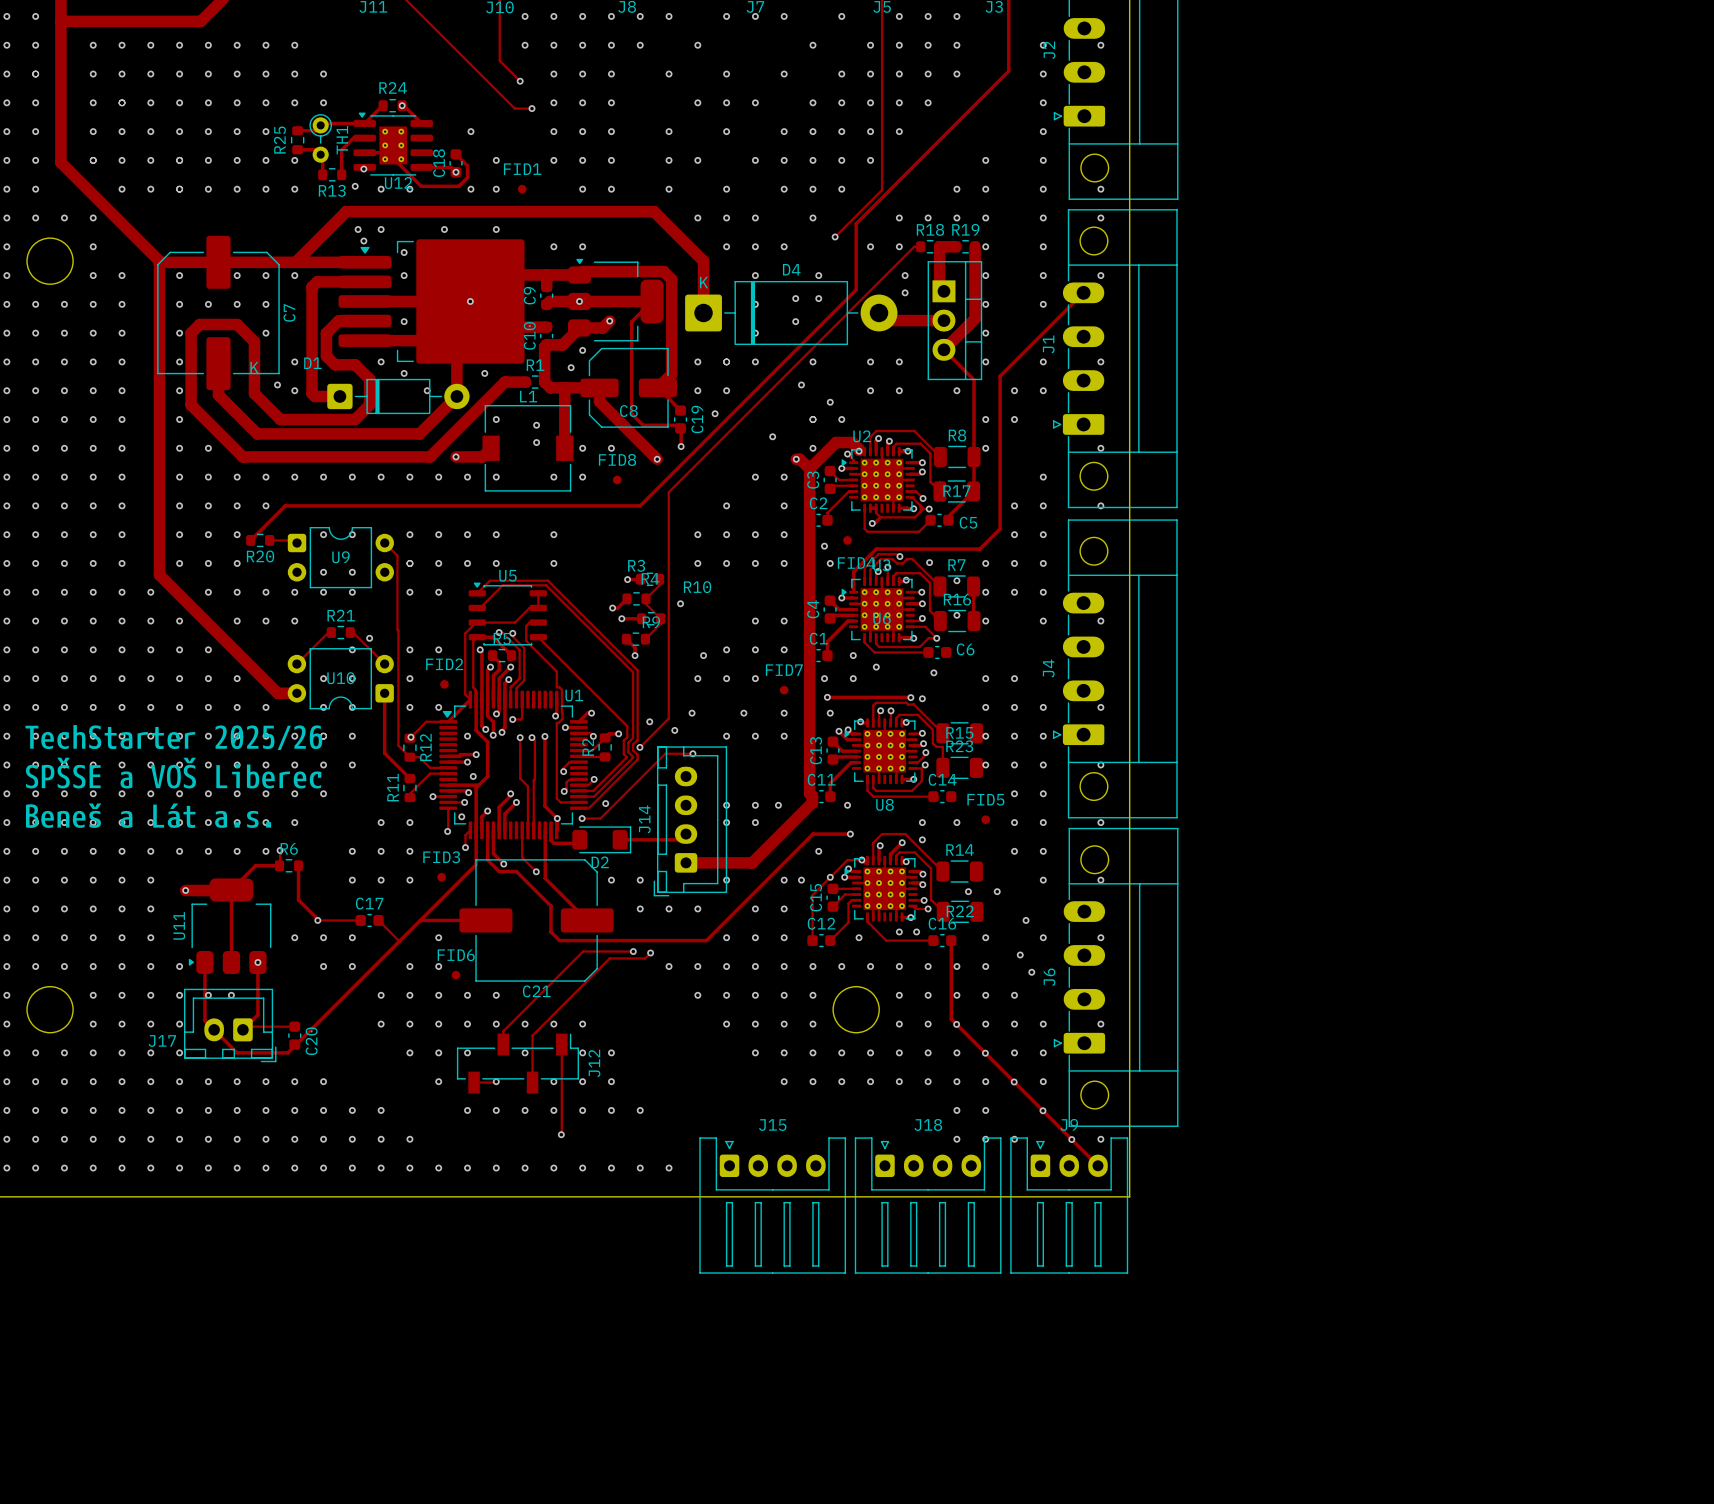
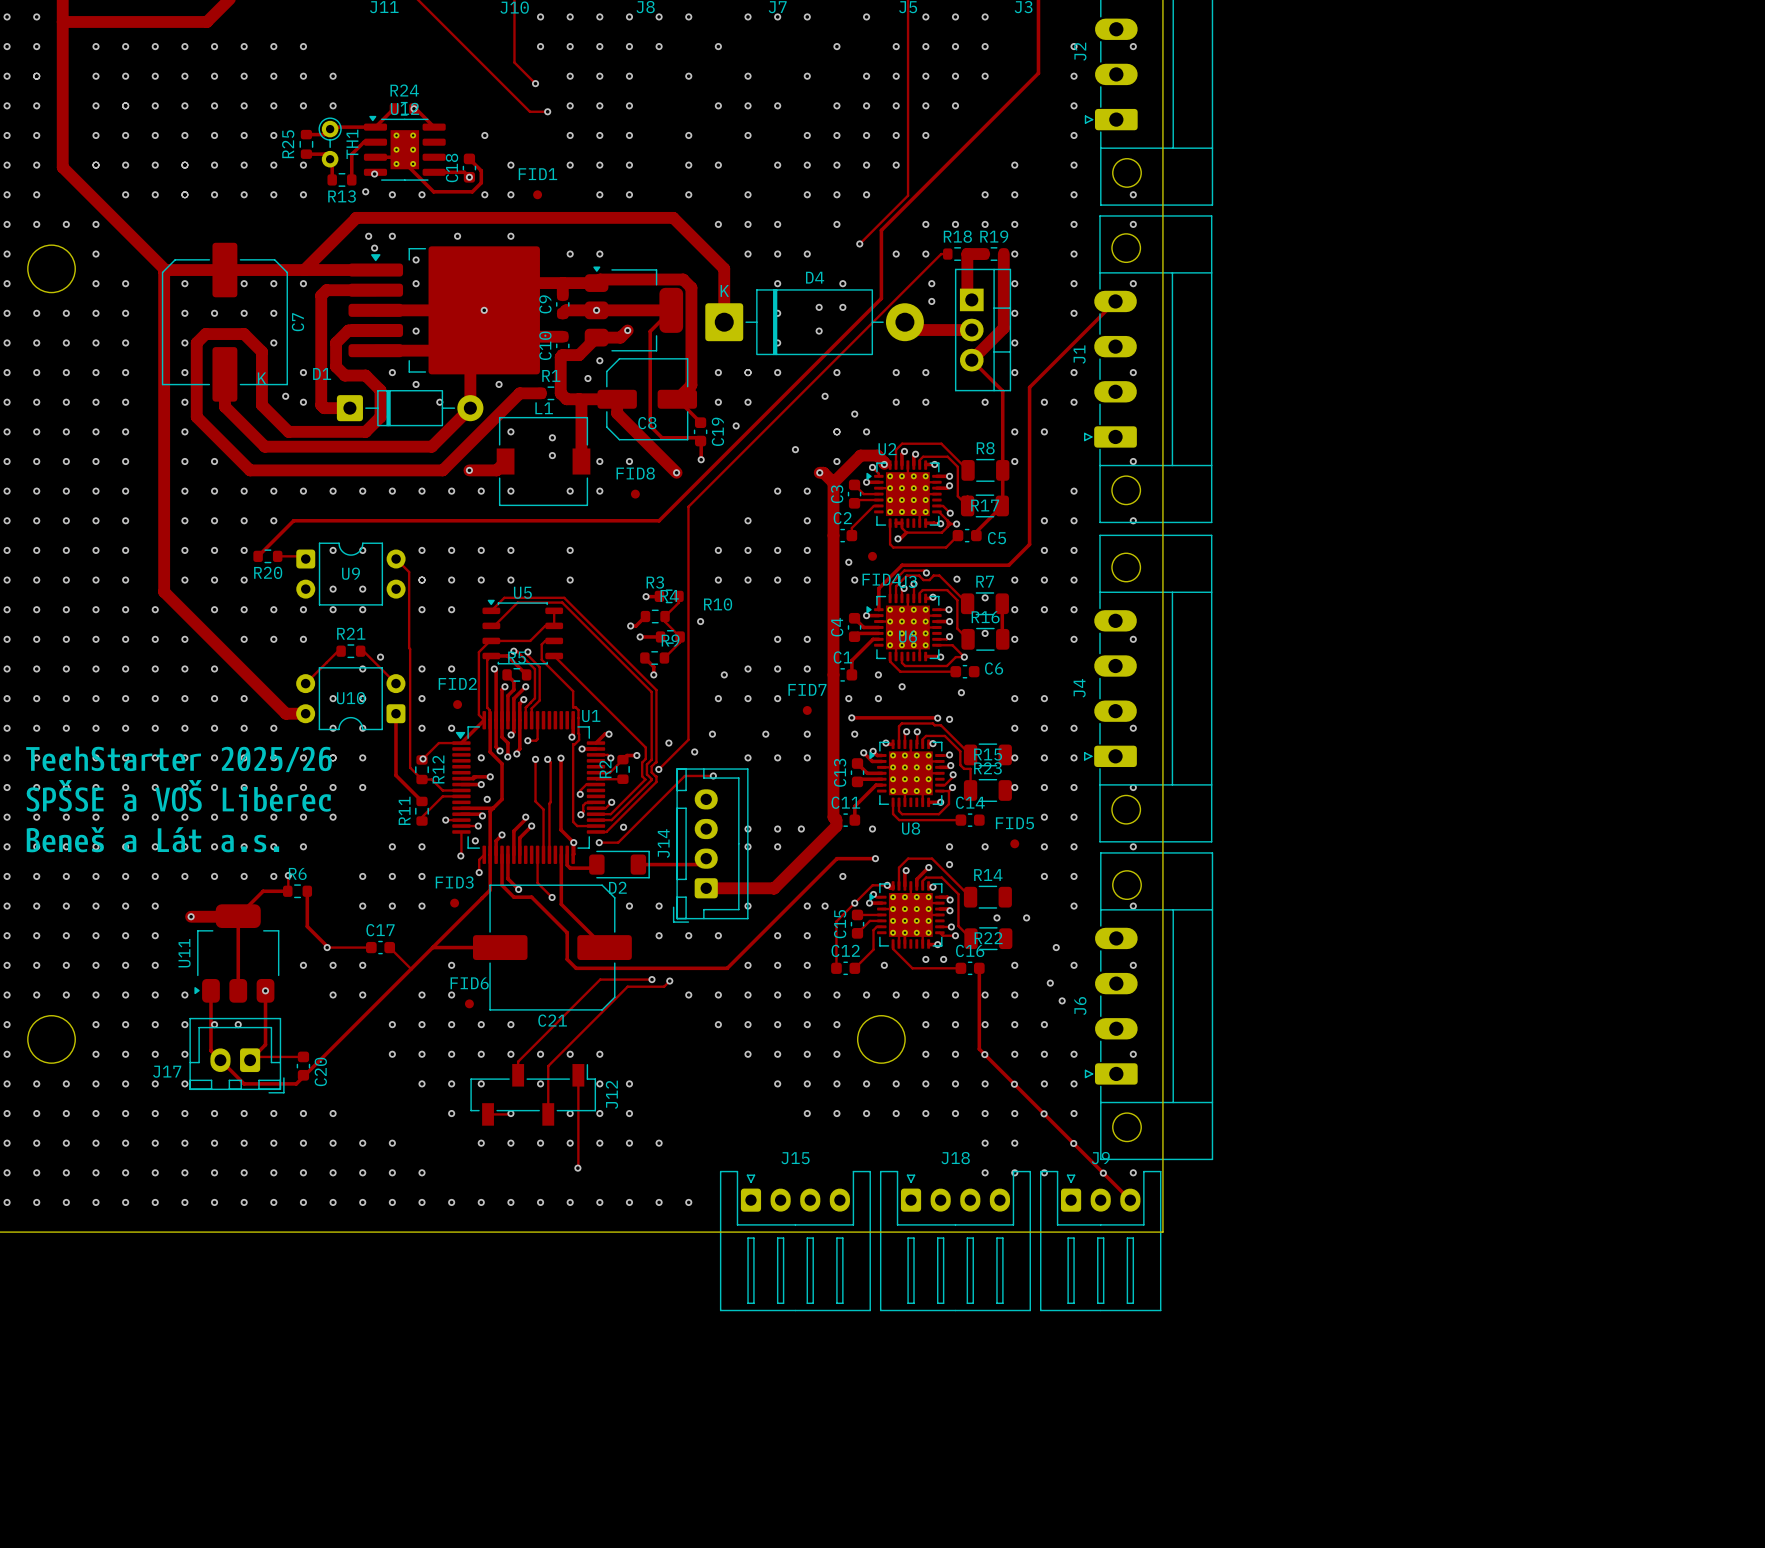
U12 name position: U12 (398, 183) -> U12 (404, 108)

